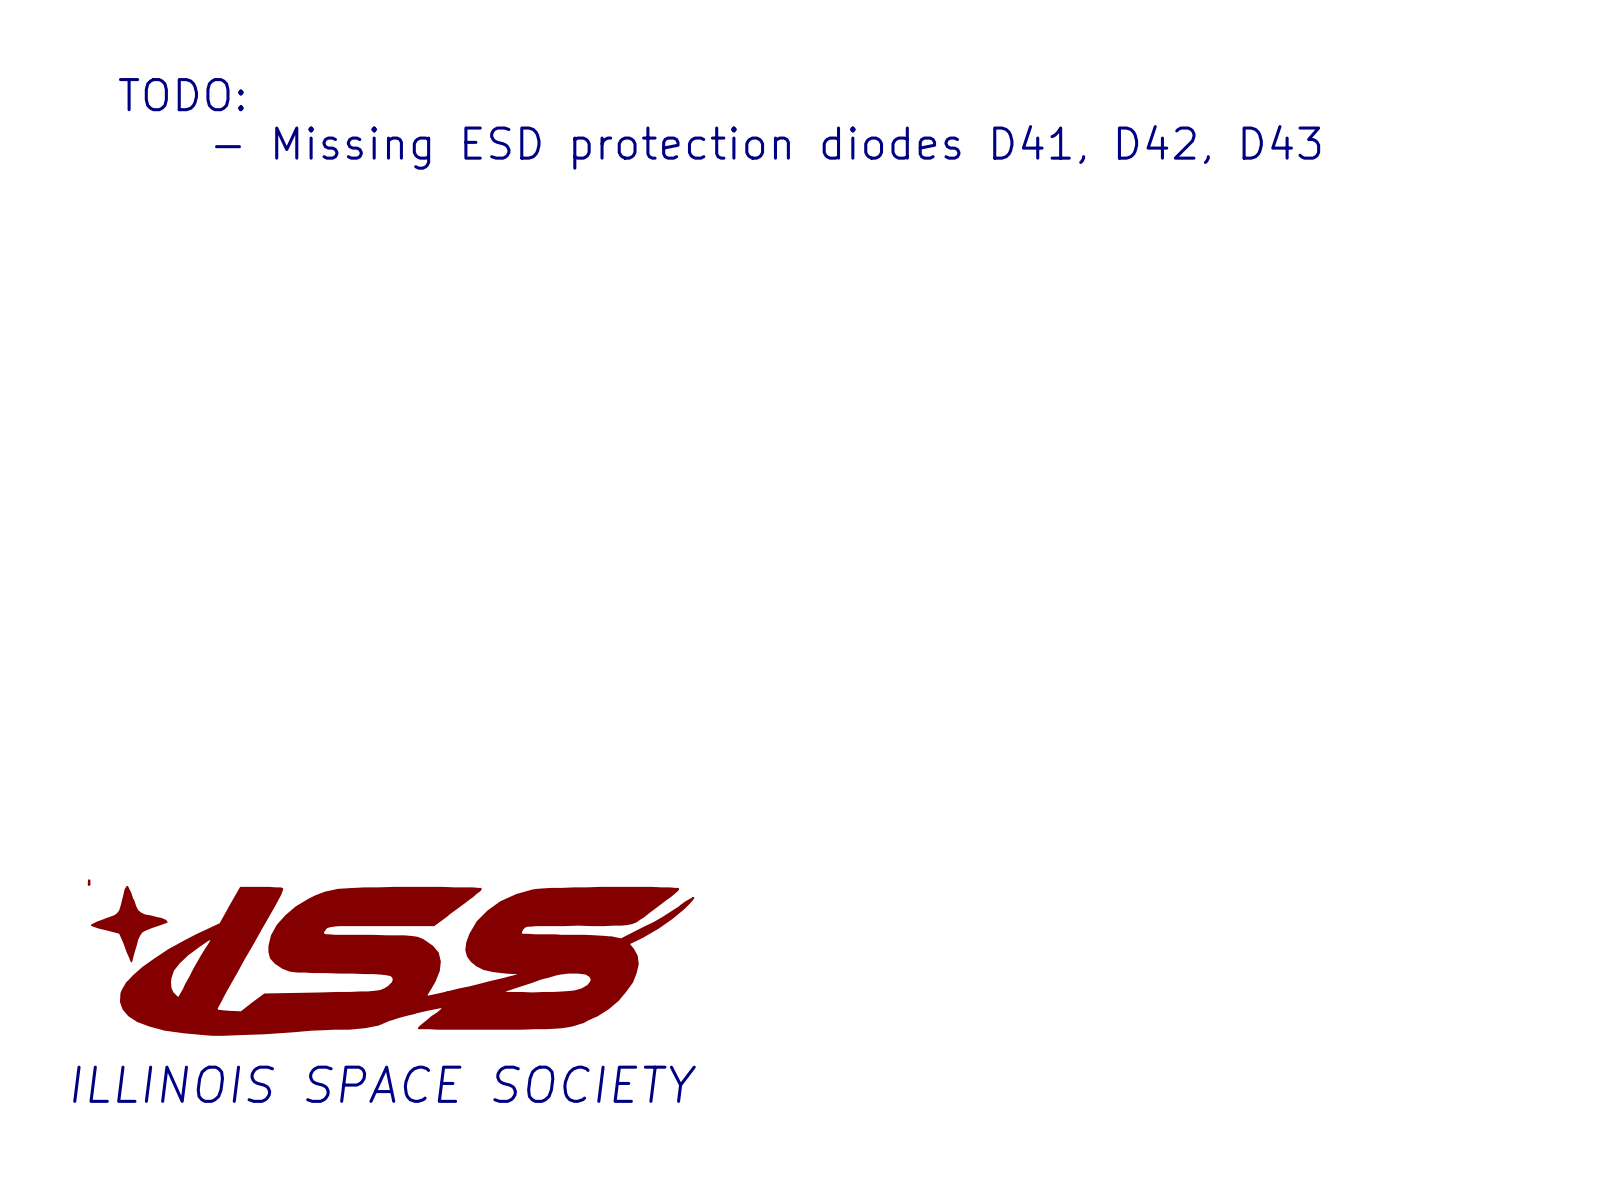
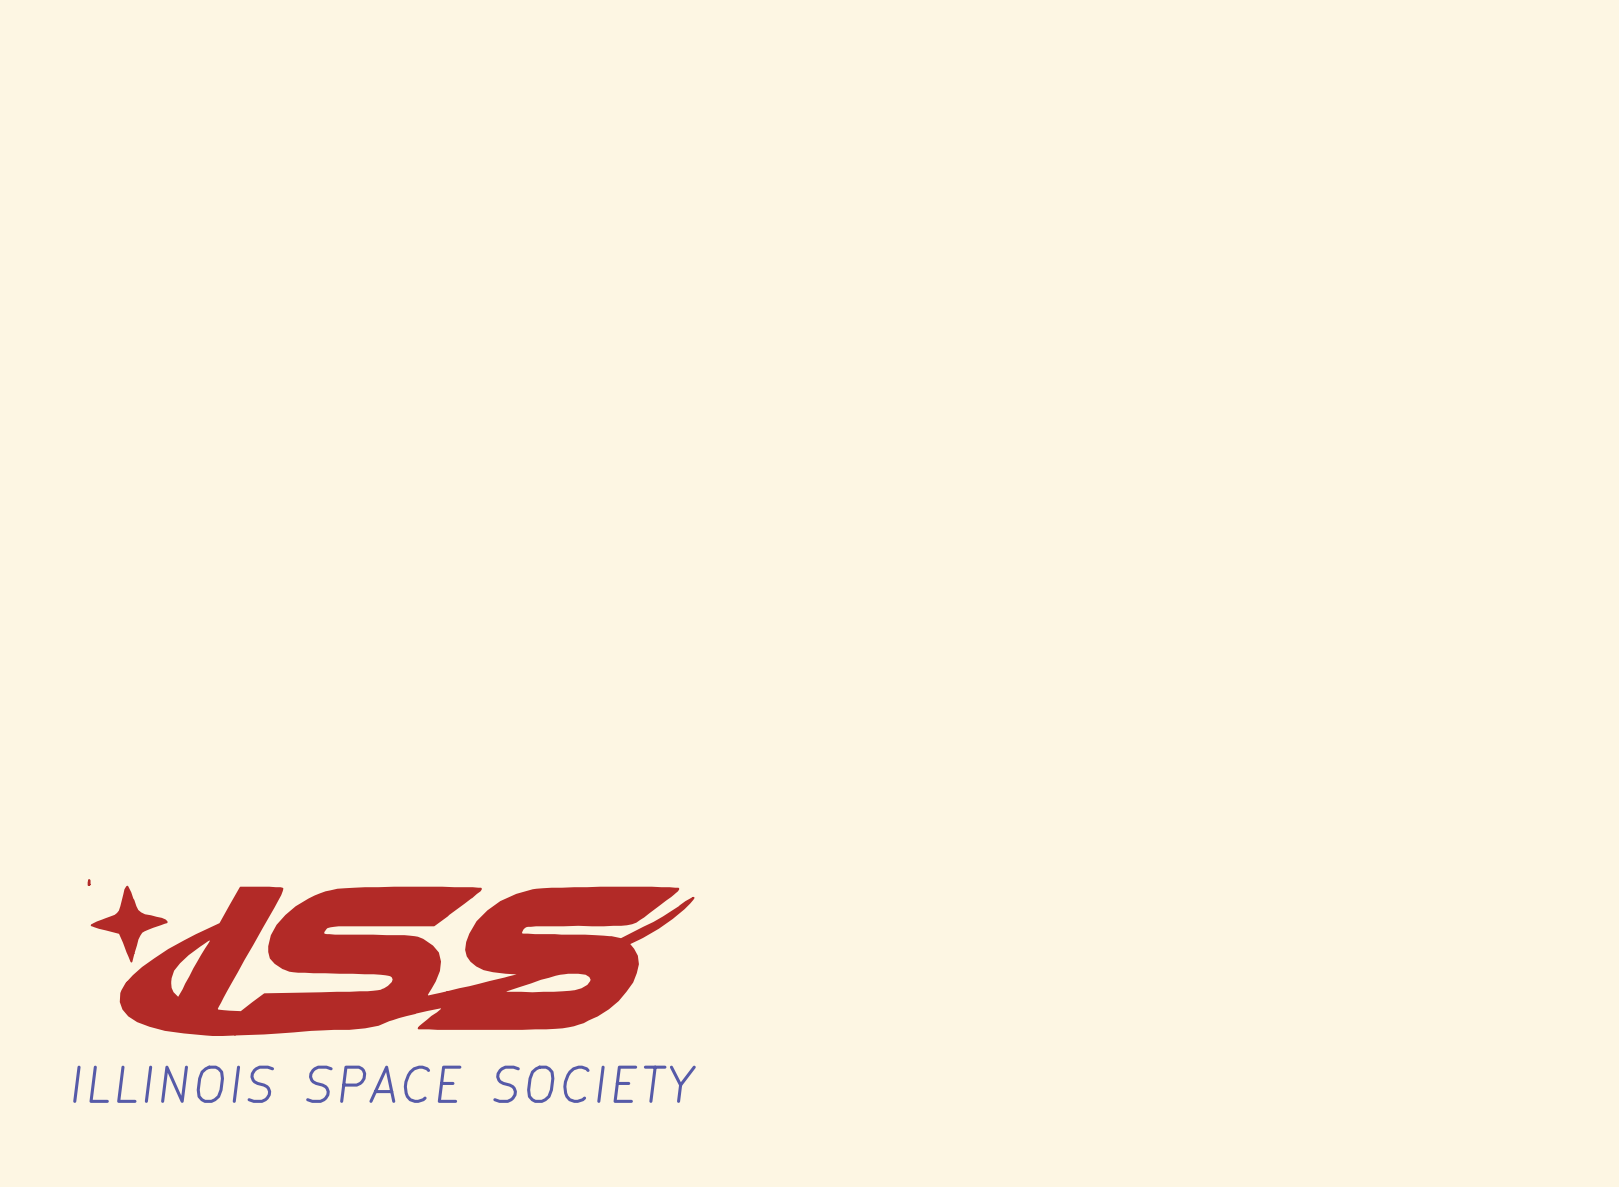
text: TODO: (181, 94) -> none
text: - Missing ESD protection diodes D41, D42, D43 (767, 147) -> none

